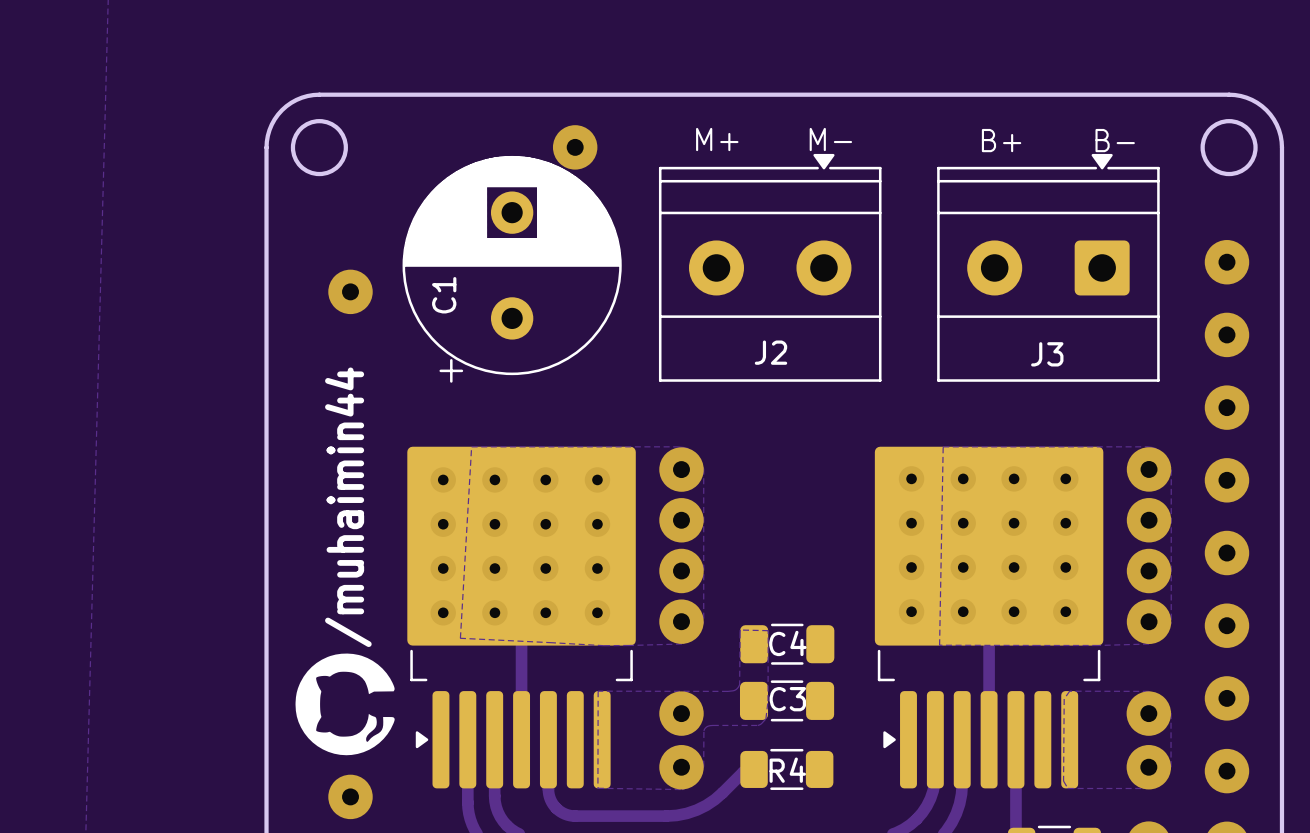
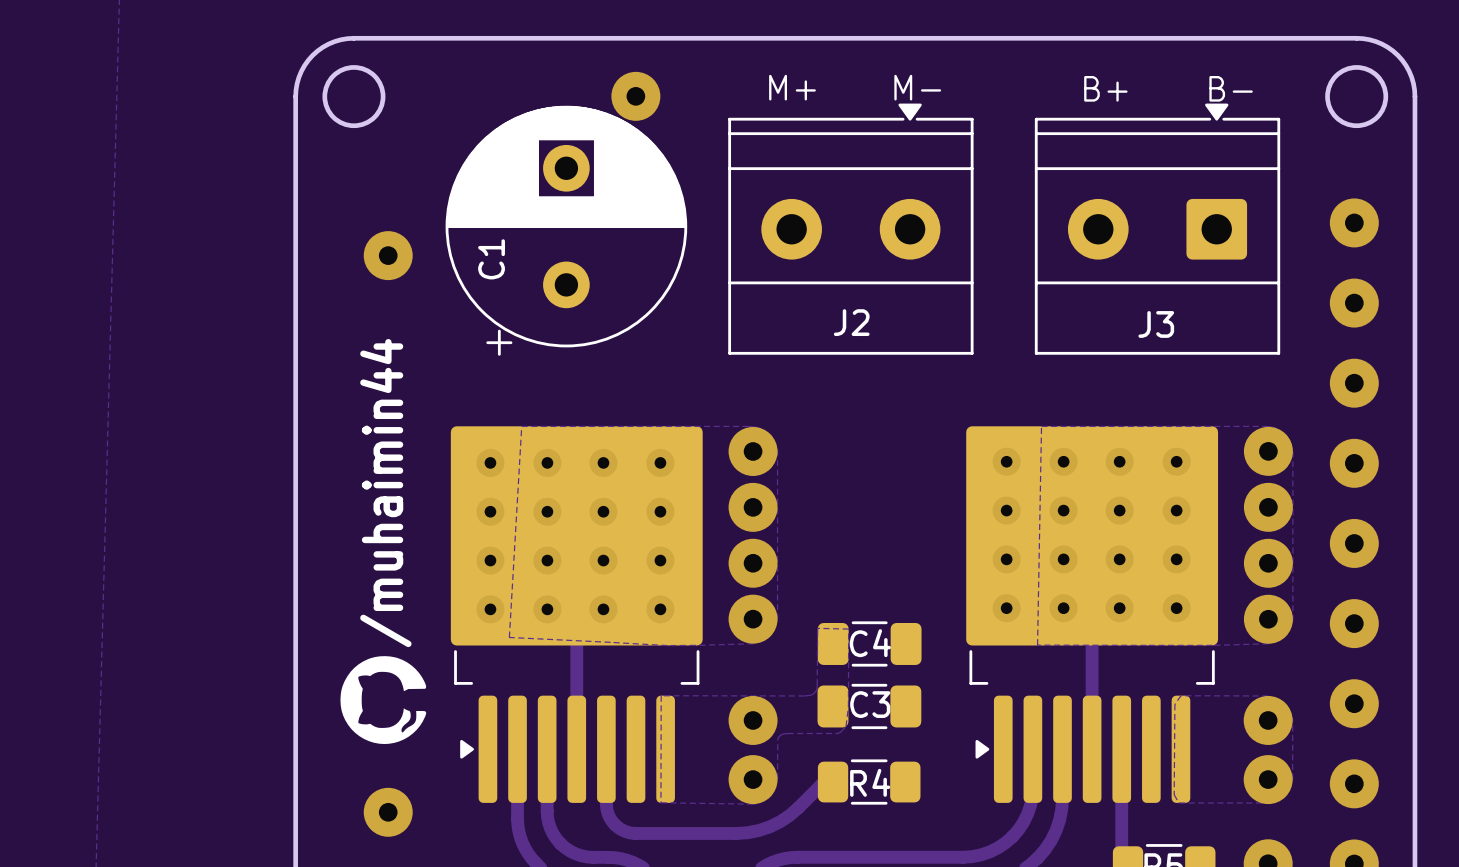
drawing shape: [295, 653, 395, 756] -> [340, 656, 427, 745]

